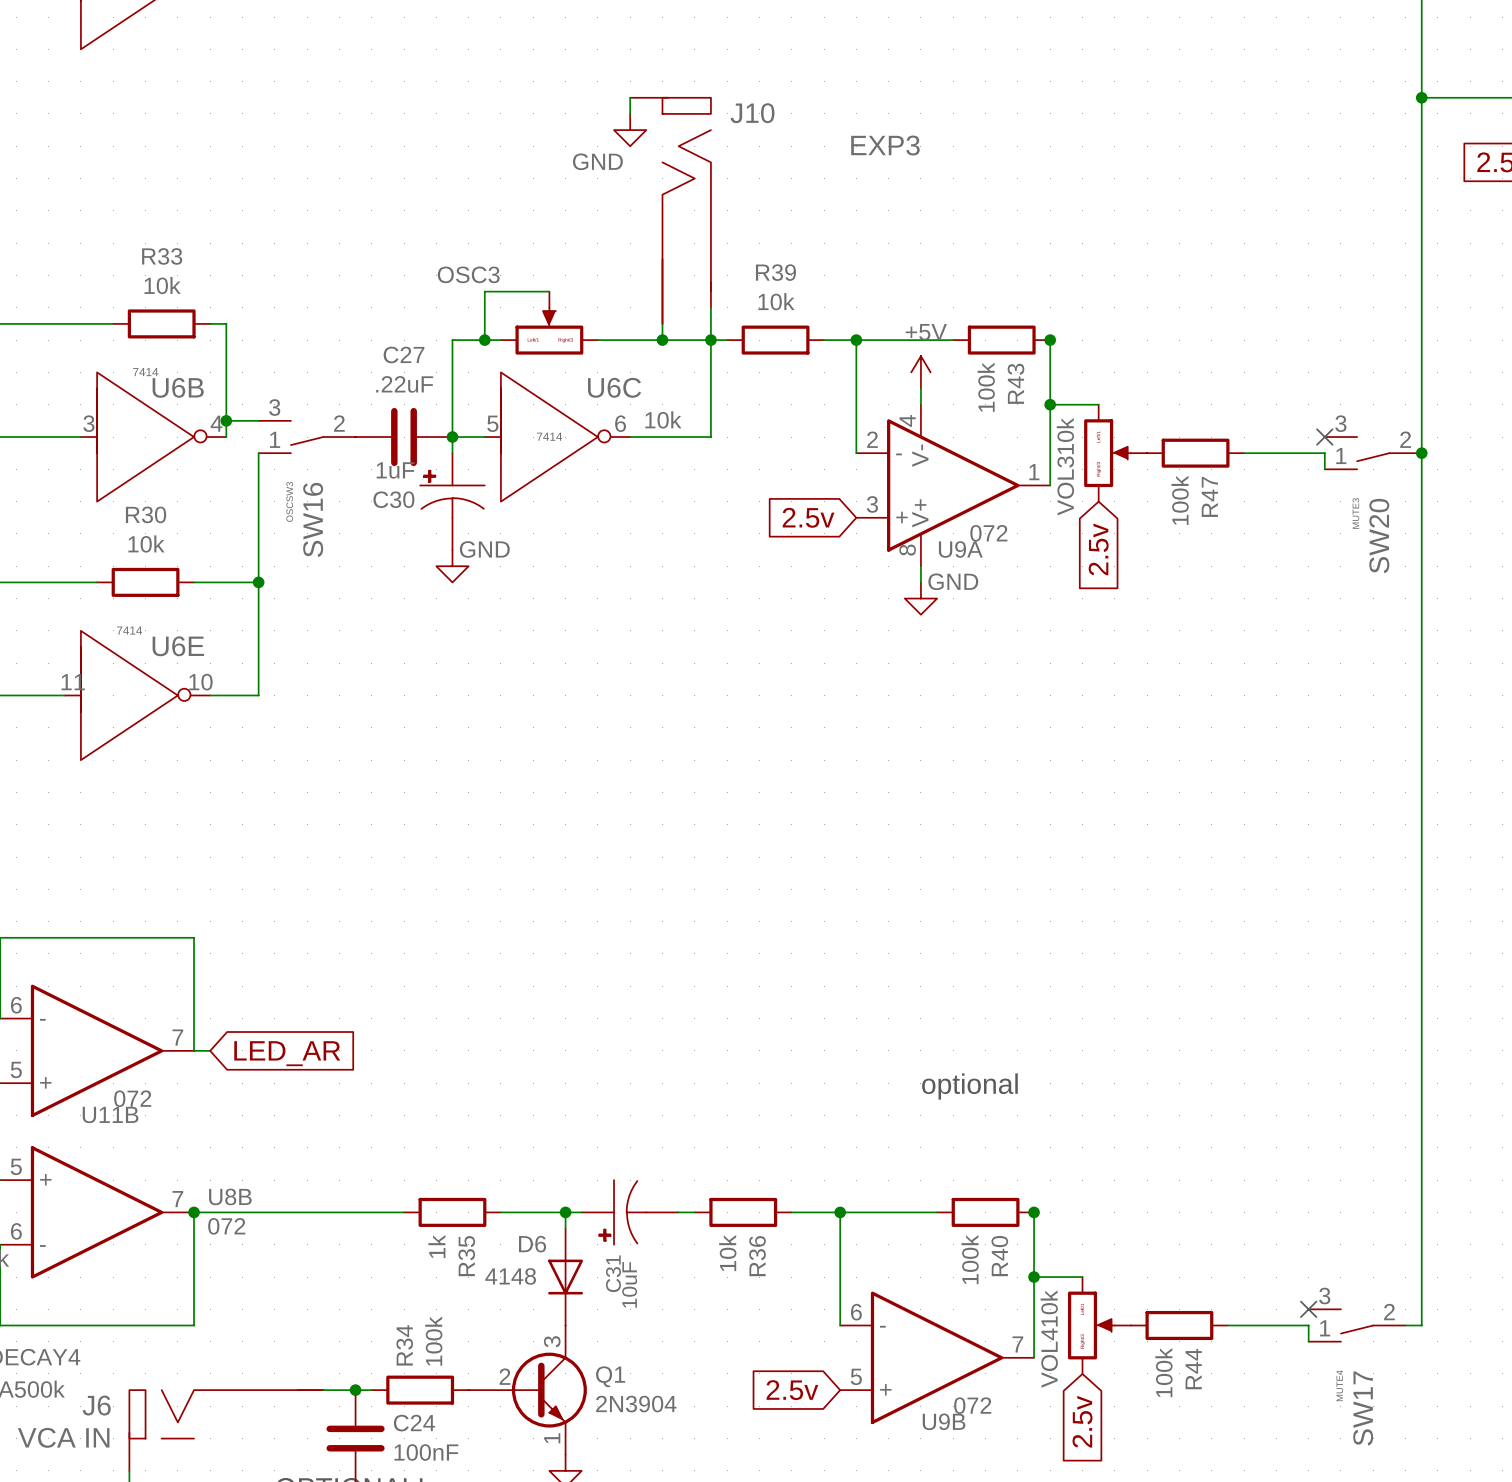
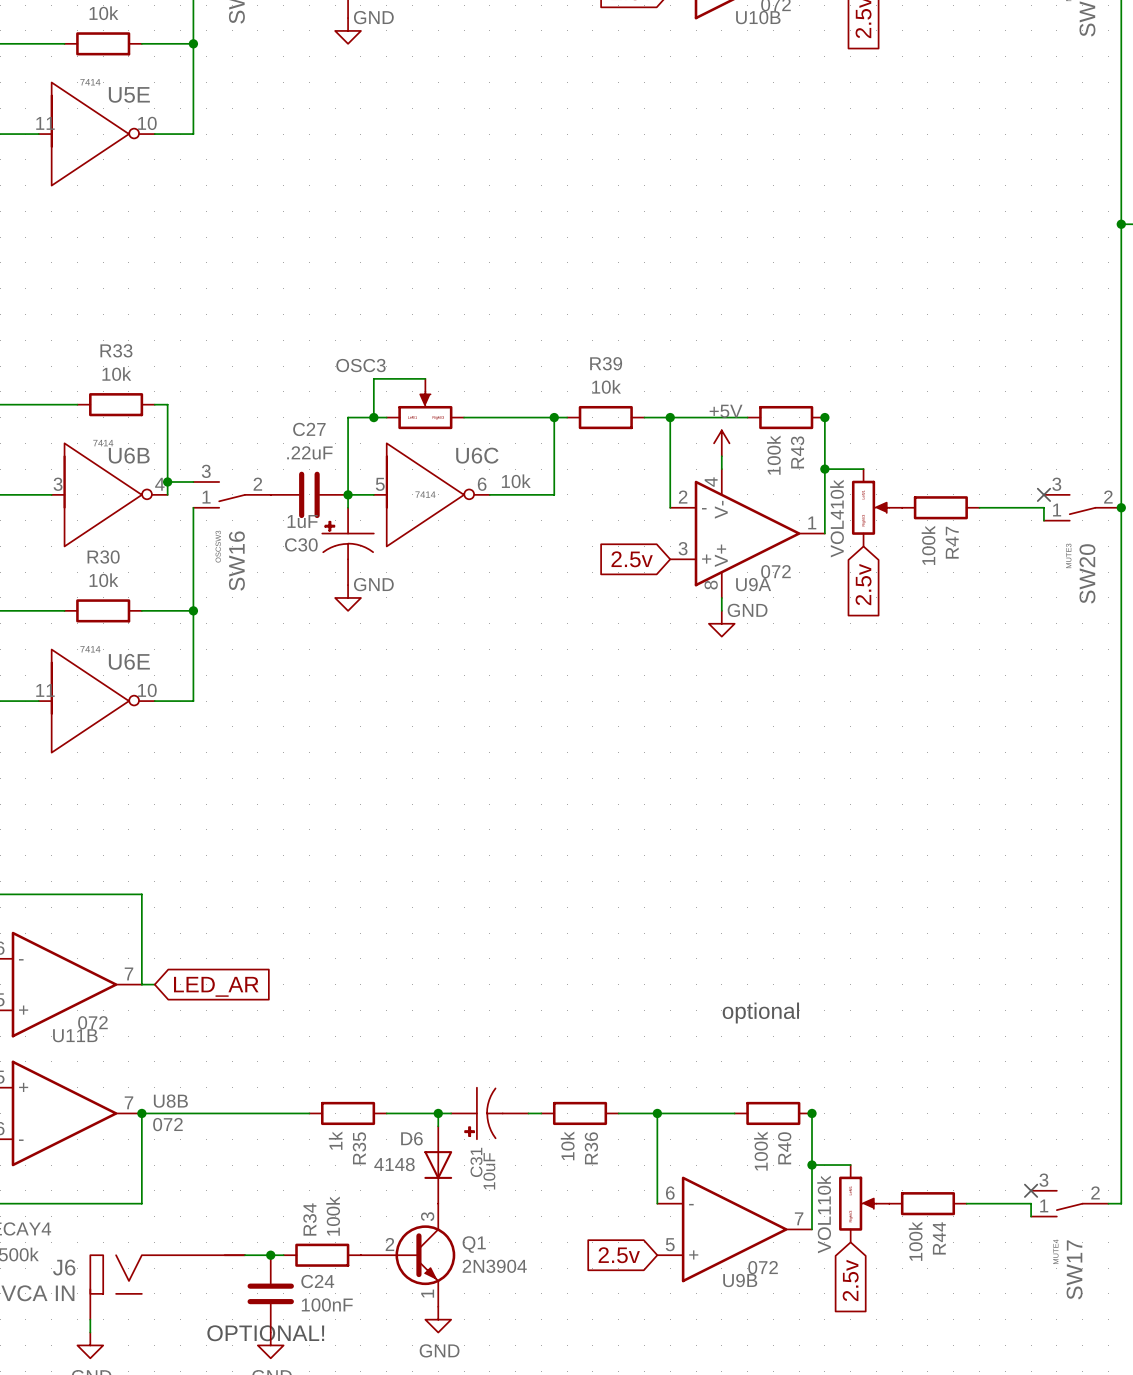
wire: (630, 97) (630, 113) -> none
power symbol: GND (630, 130) -> none
J10: EXP3 (670, 210) -> none
wire: (710, 307) (710, 340) -> none
wire: (662, 323) (662, 340) -> none
junction: (662, 340) -> none
VOL3 name: VOL3 (1065, 485) -> VOL4 (837, 533)
VOL4 name: VOL4 (1049, 1358) -> VOL1 (824, 1229)

